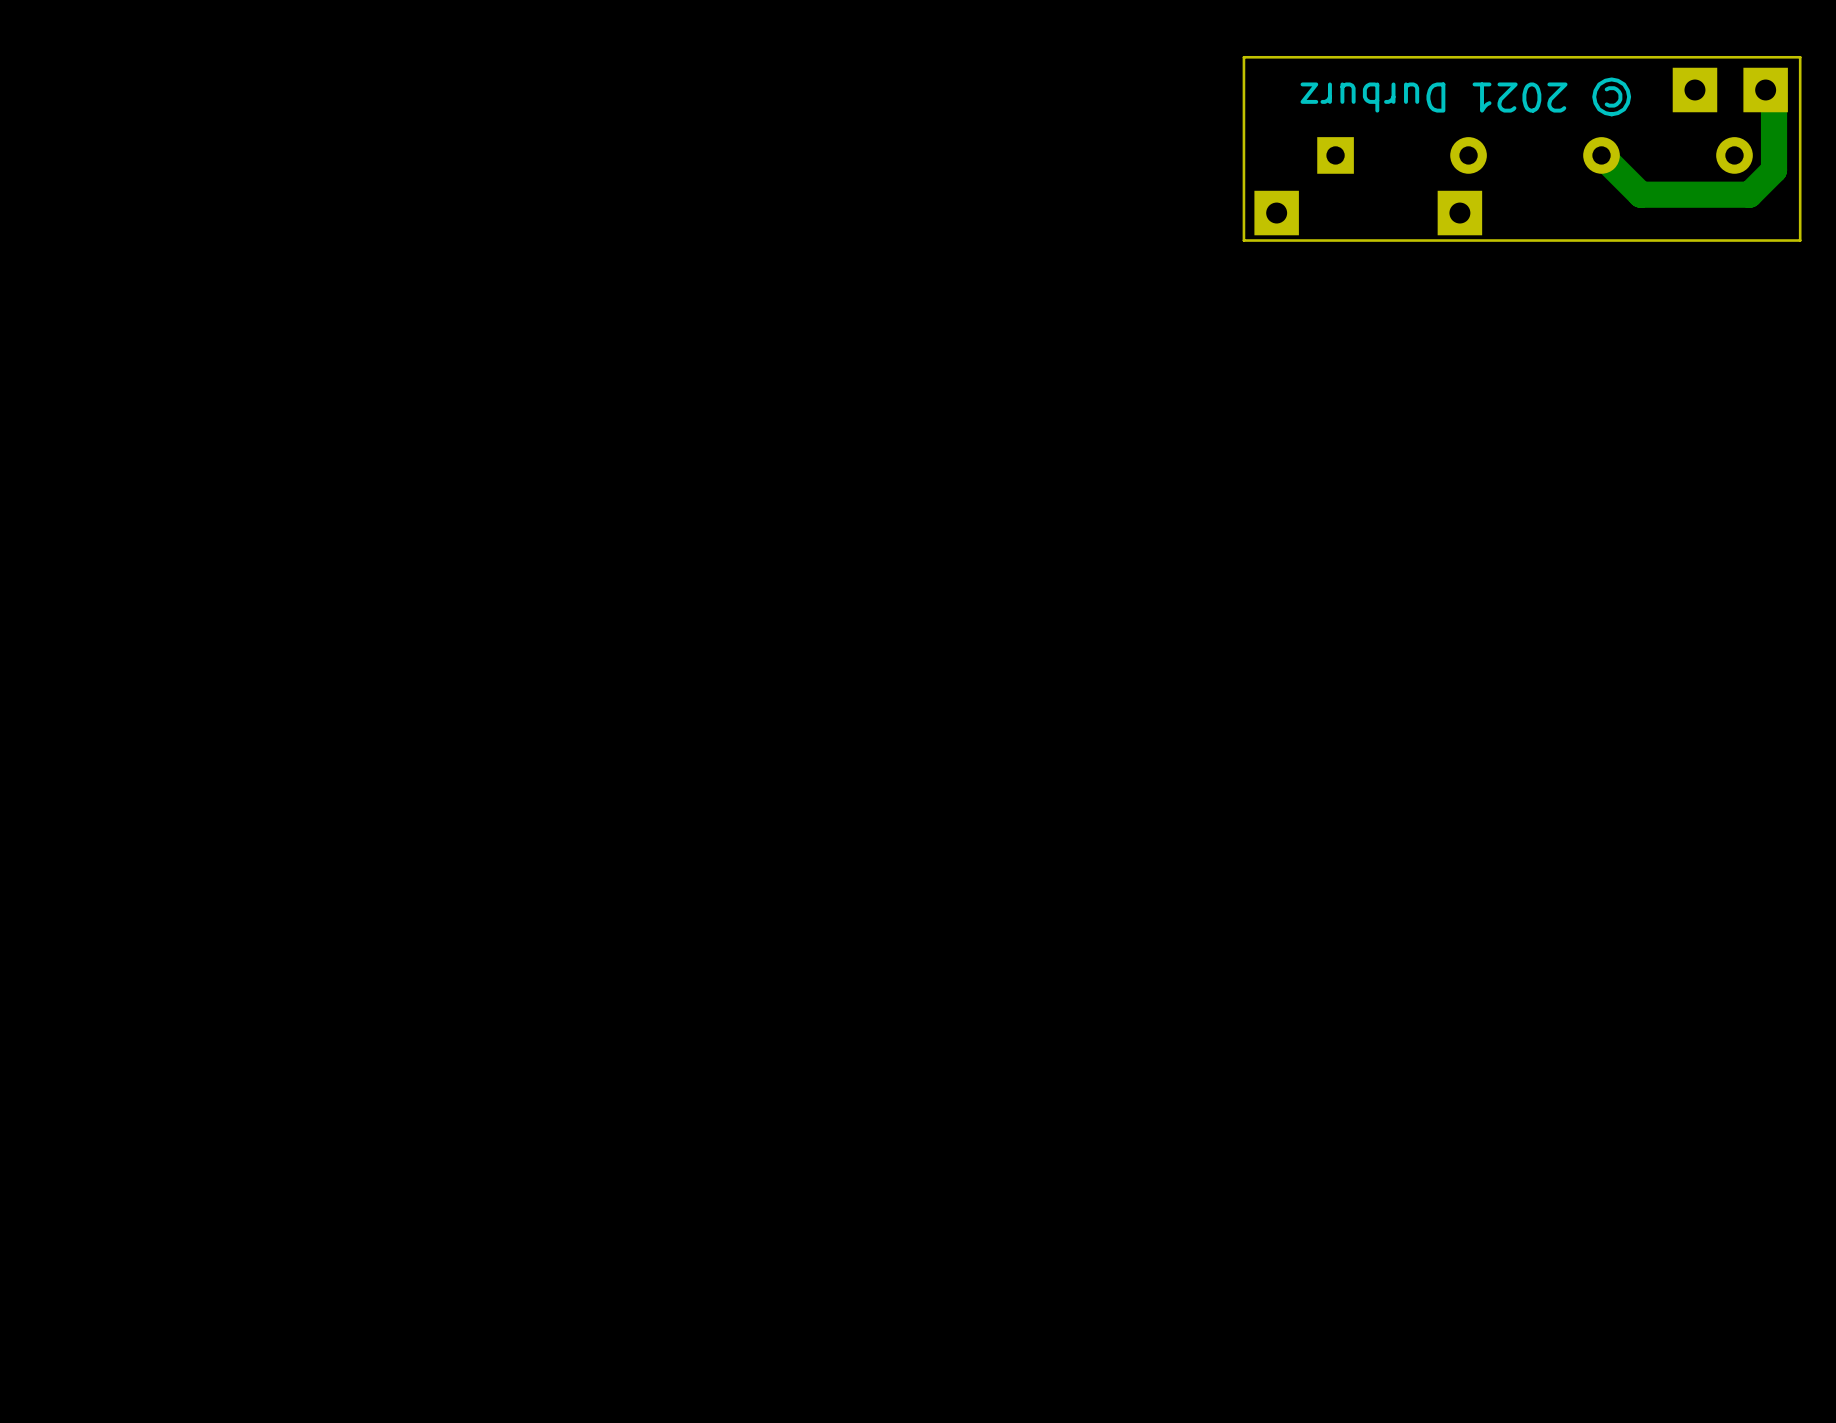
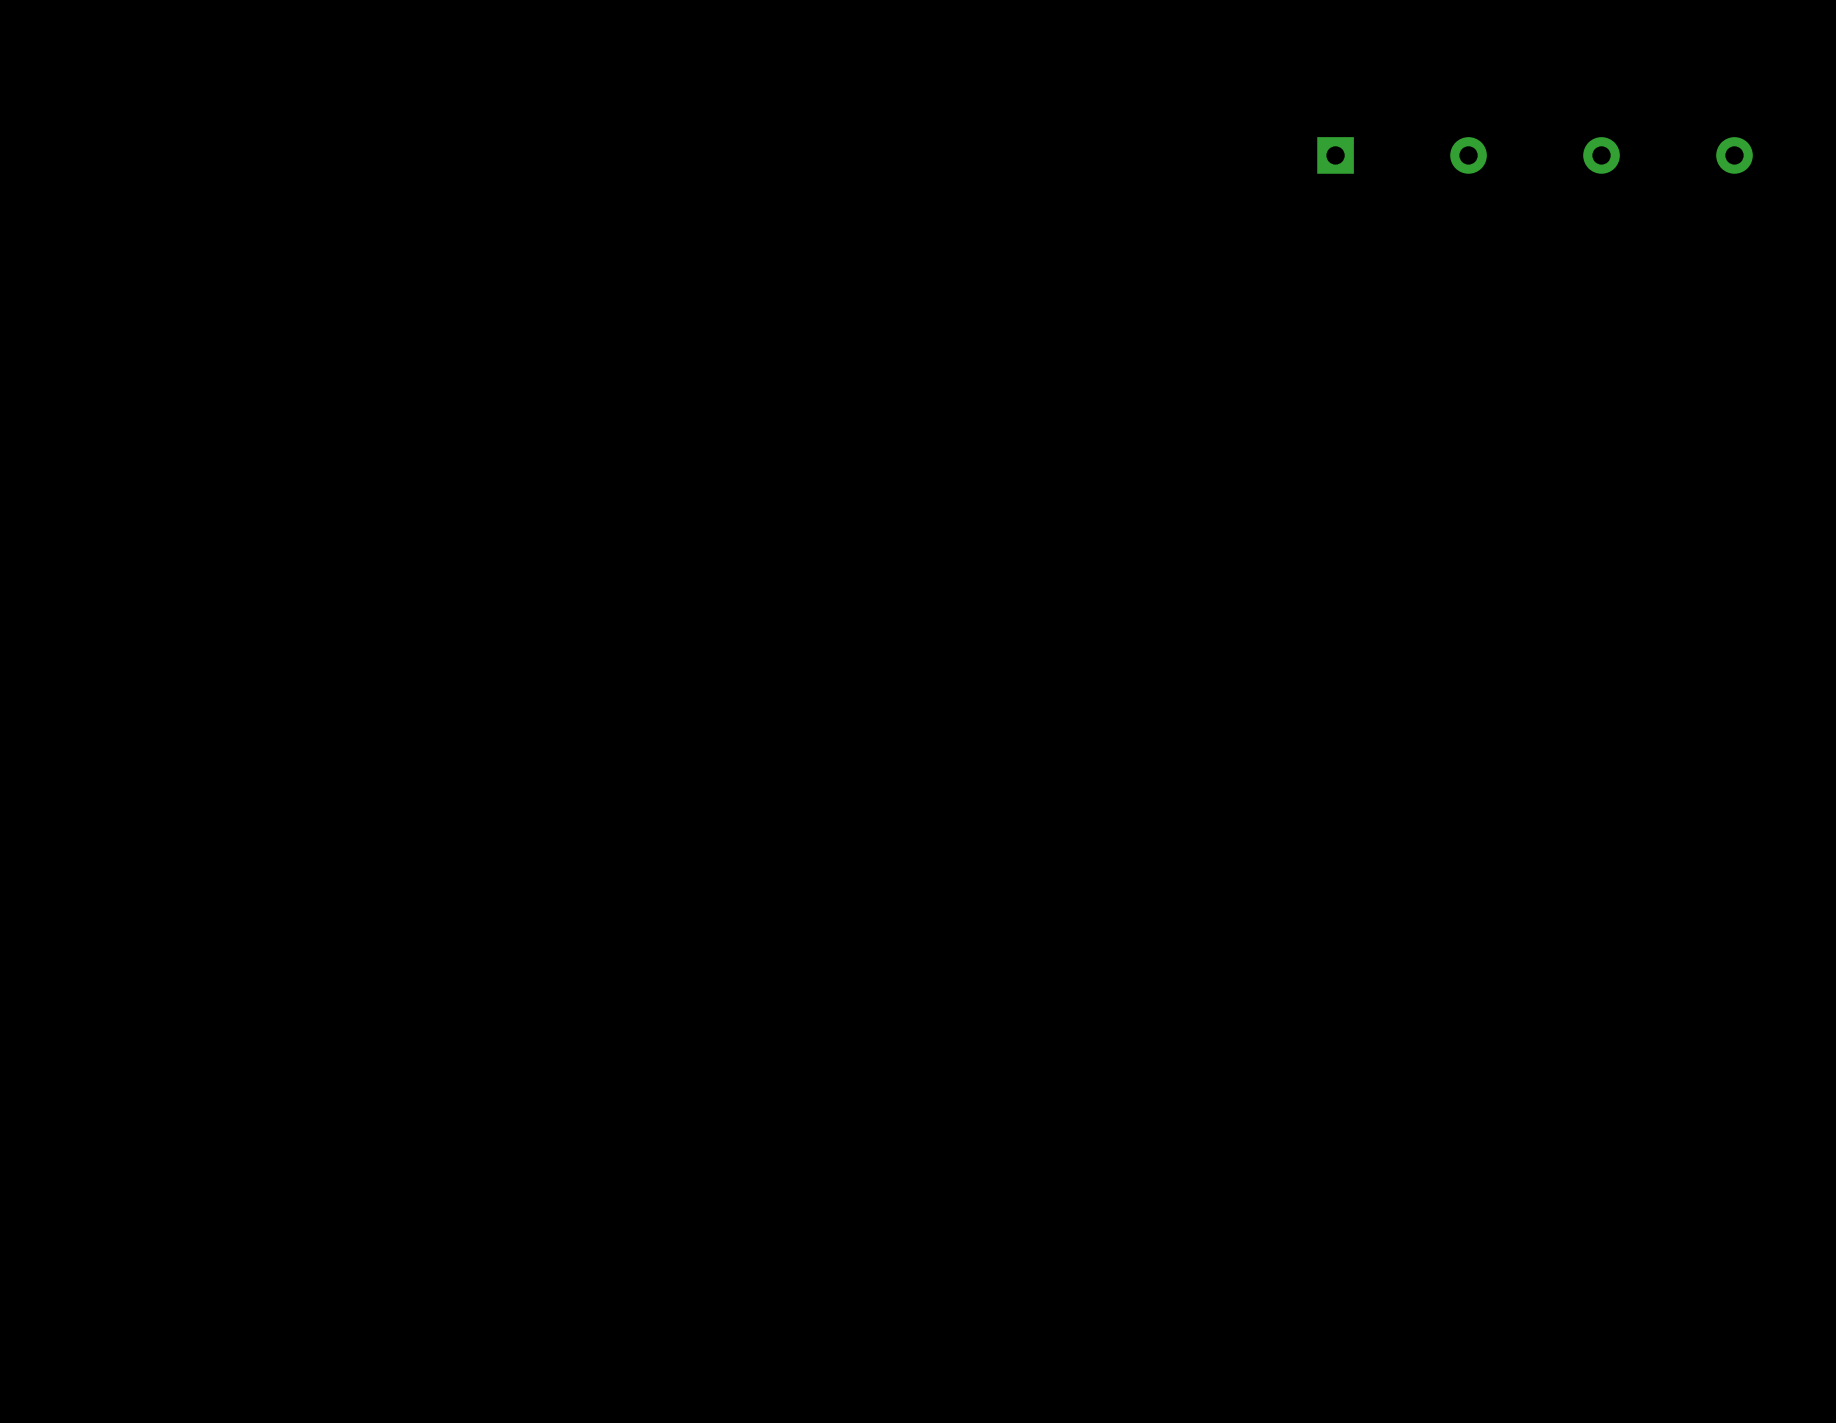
board edge: (1800, 57) (1800, 240) (1243, 240) (1243, 57) (1800, 57) -> none
part: (1694, 90) -> none
track: (1765, 90) (1774, 98) (1774, 170) (1749, 194) (1640, 194) (1601, 155) -> none
part: (1765, 90) -> none
text: © 2021 Durburz (1465, 96) -> none
part: (1276, 213) -> none
part: (1459, 213) -> none

